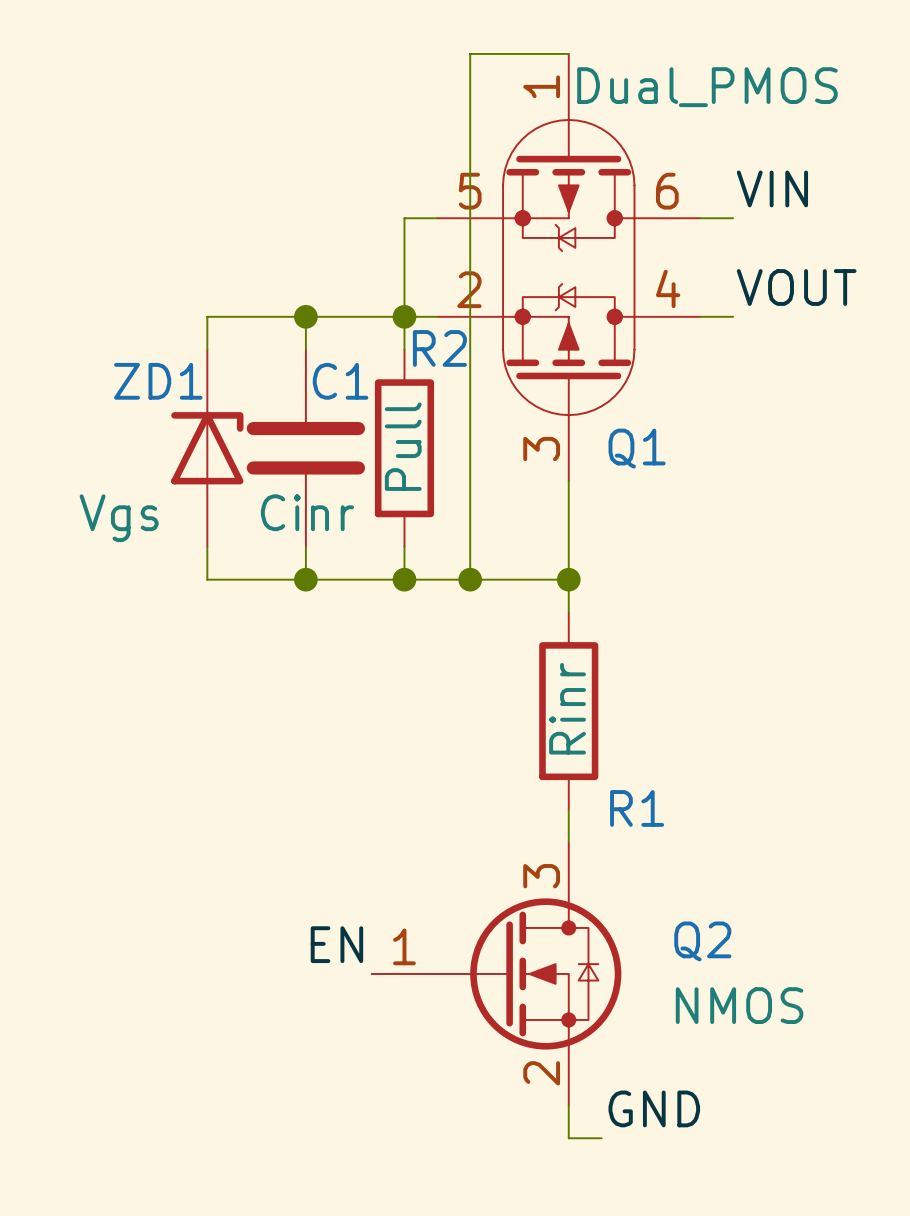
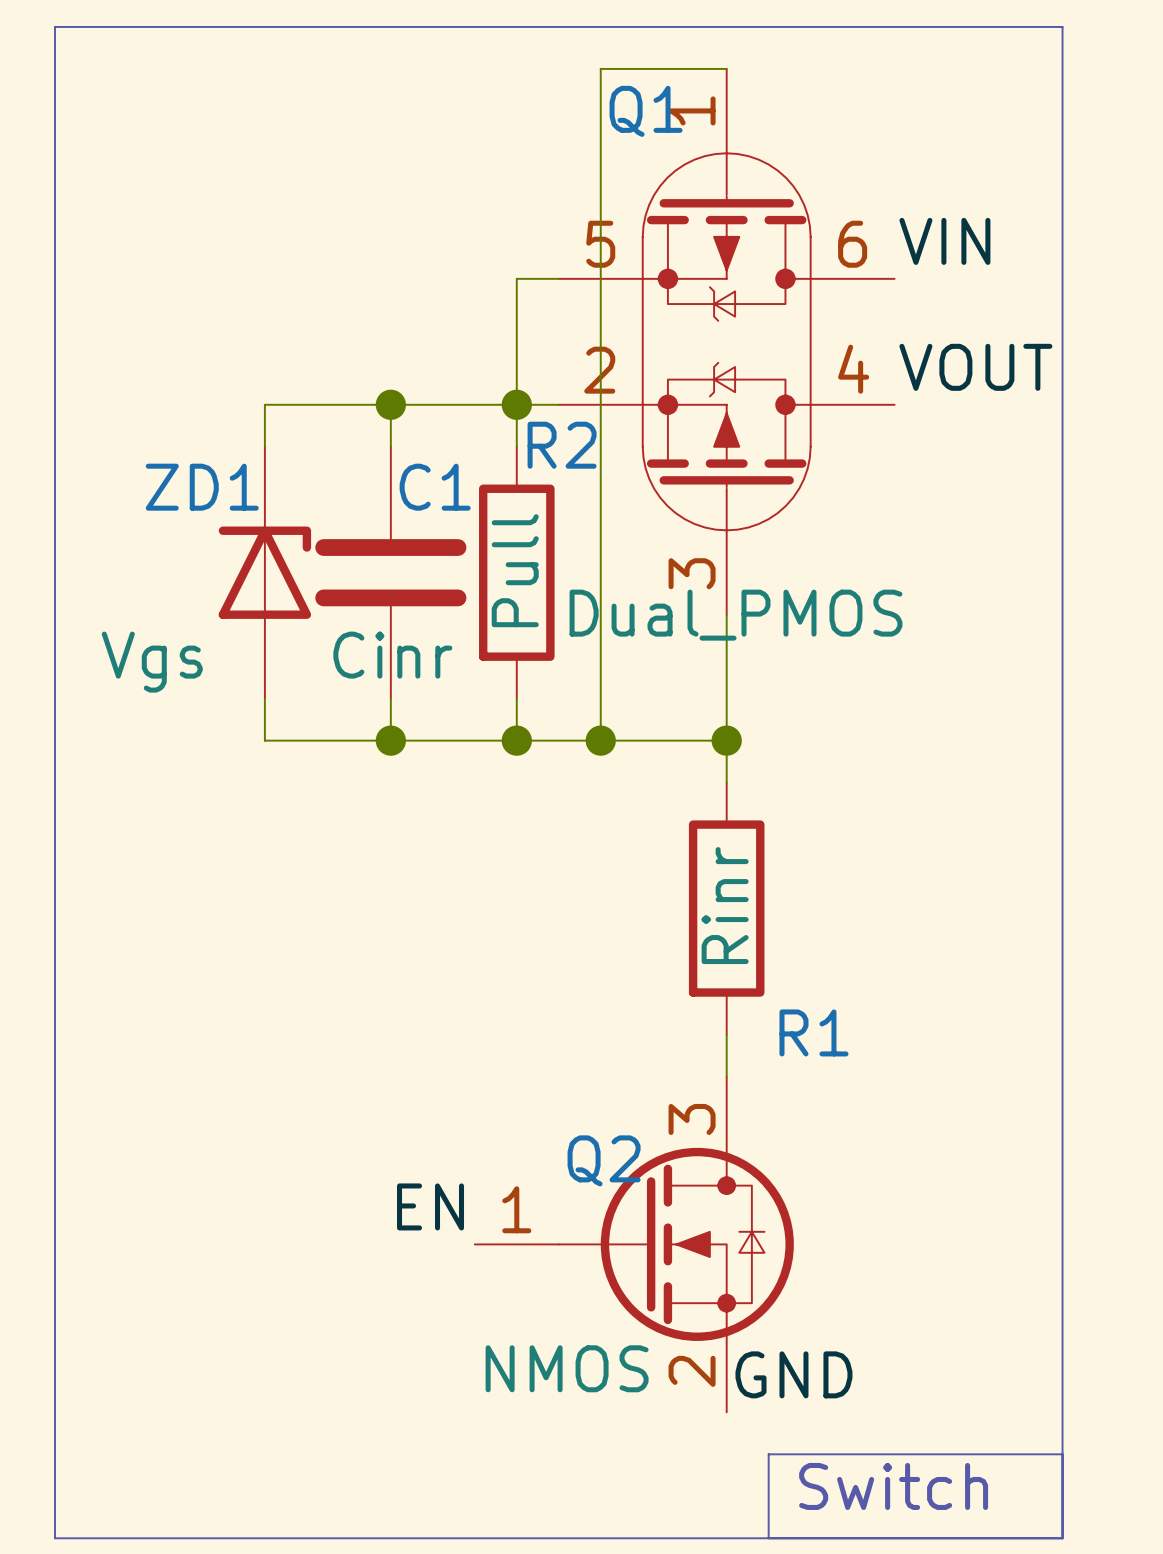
line: none -> (55, 26) (1062, 26) (1062, 1538) (55, 1538) (55, 26)
Q1 value position: Dual_PMOS (707, 87) -> Dual_PMOS (736, 615)
label position: VIN (772, 188) -> VIN (944, 241)
wire: (700, 218) (733, 218) -> none
label position: VOUT (796, 287) -> VOUT (975, 367)
wire: (700, 316) (733, 316) -> none
Q1 name position: Q1 (637, 448) -> Q1 (646, 111)
Q2 name position: Q2 (702, 941) -> Q2 (604, 1160)
Q2 value position: NMOS (739, 1005) -> NMOS (567, 1368)
wire: (568, 1105) (568, 1138) (601, 1138) -> none
label position: GND (654, 1108) -> GND (793, 1374)
line: none -> (1062, 1454) (768, 1454) (768, 1538)
text: none -> Switch (893, 1486)

